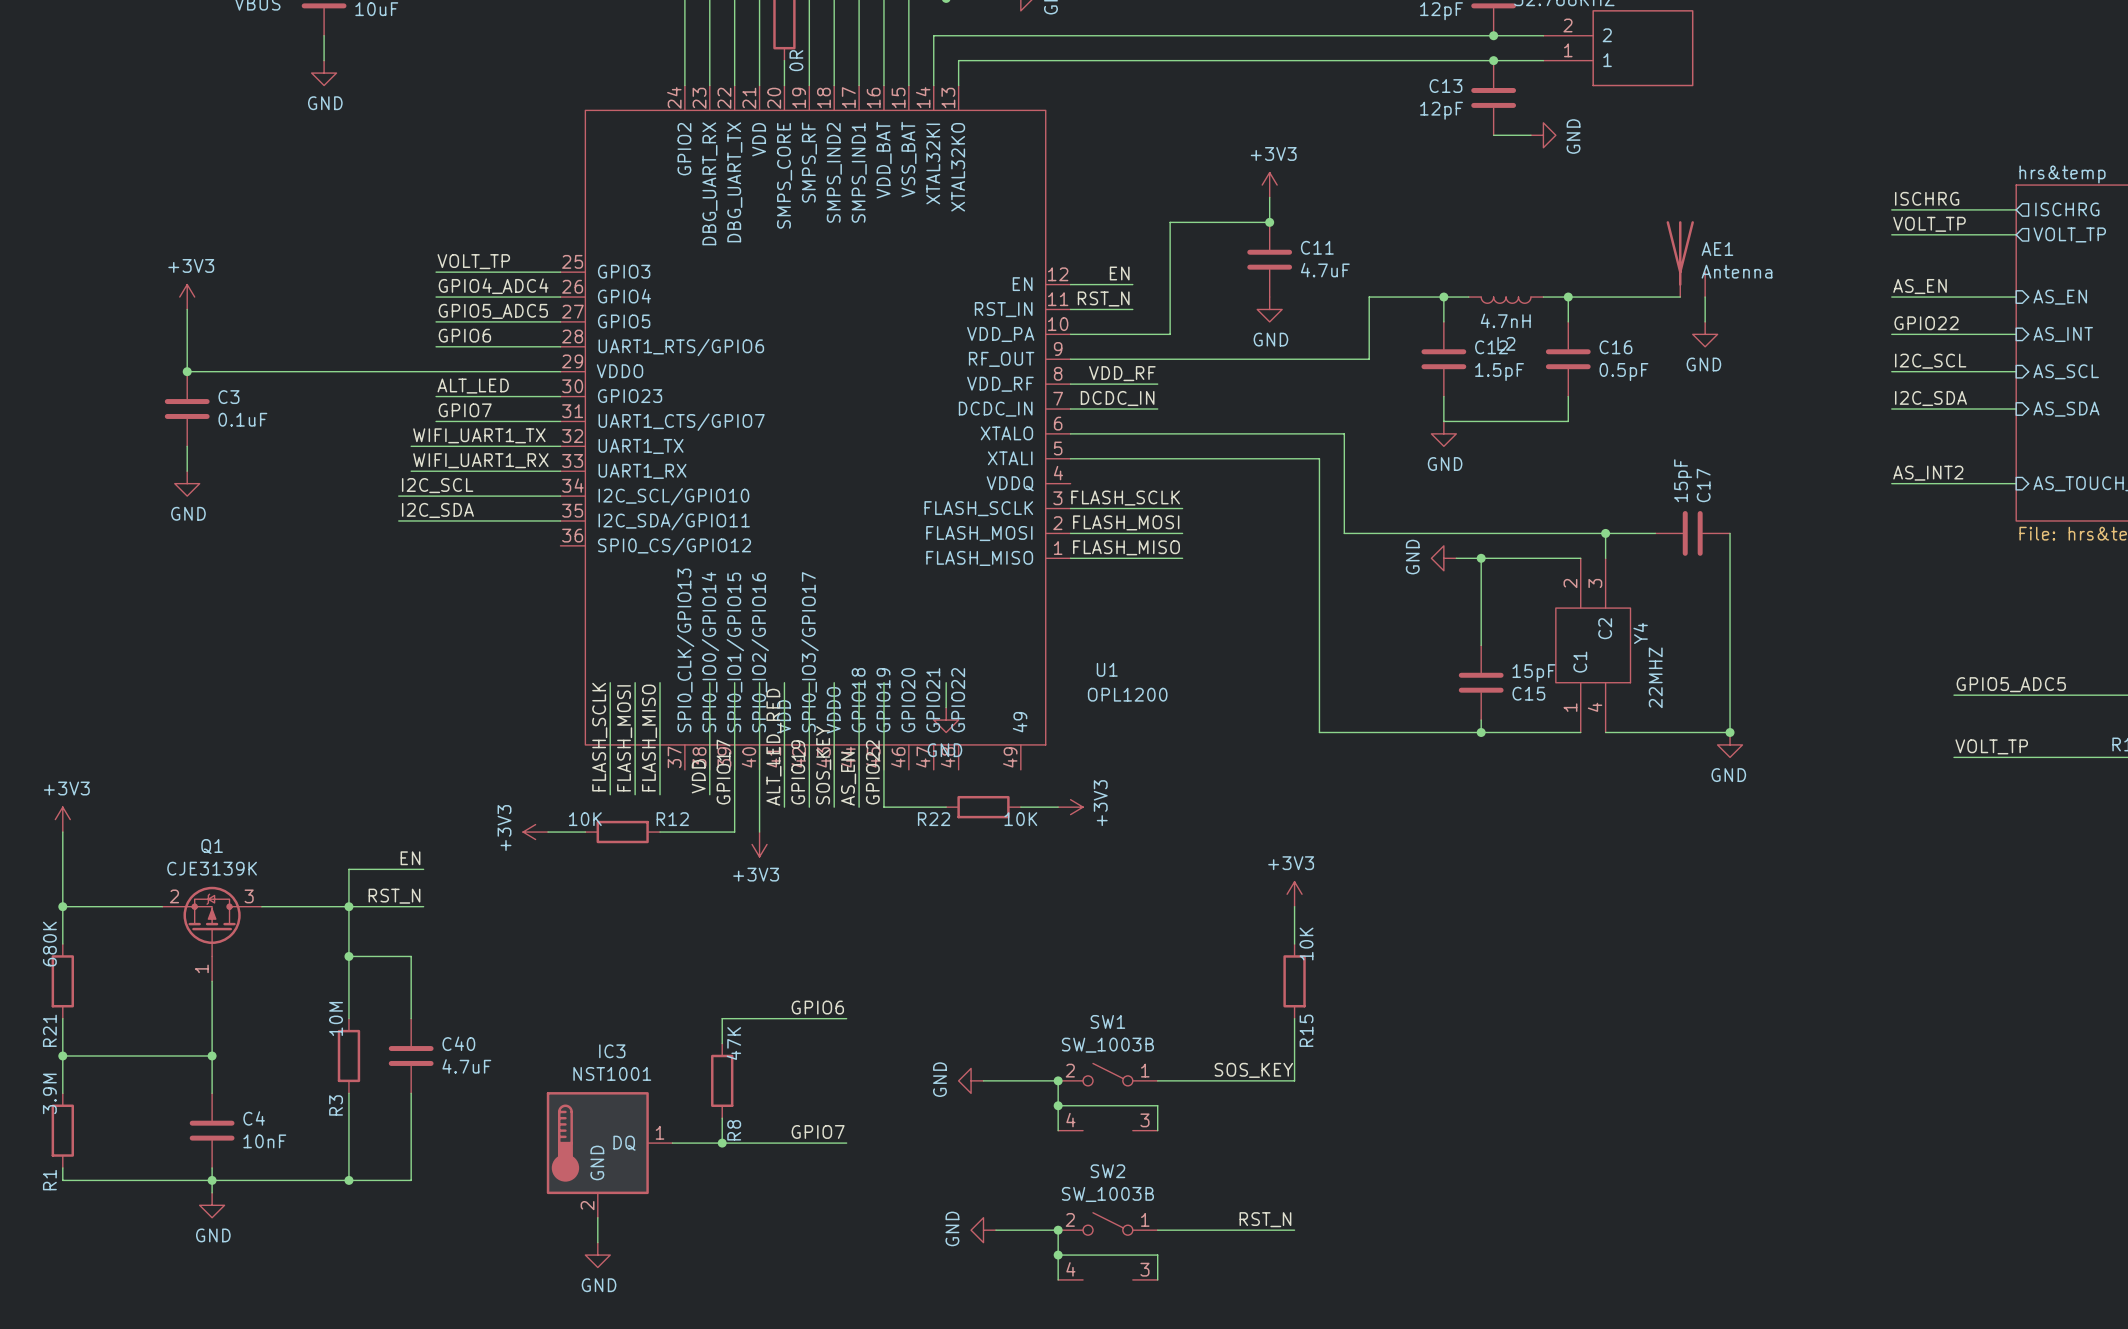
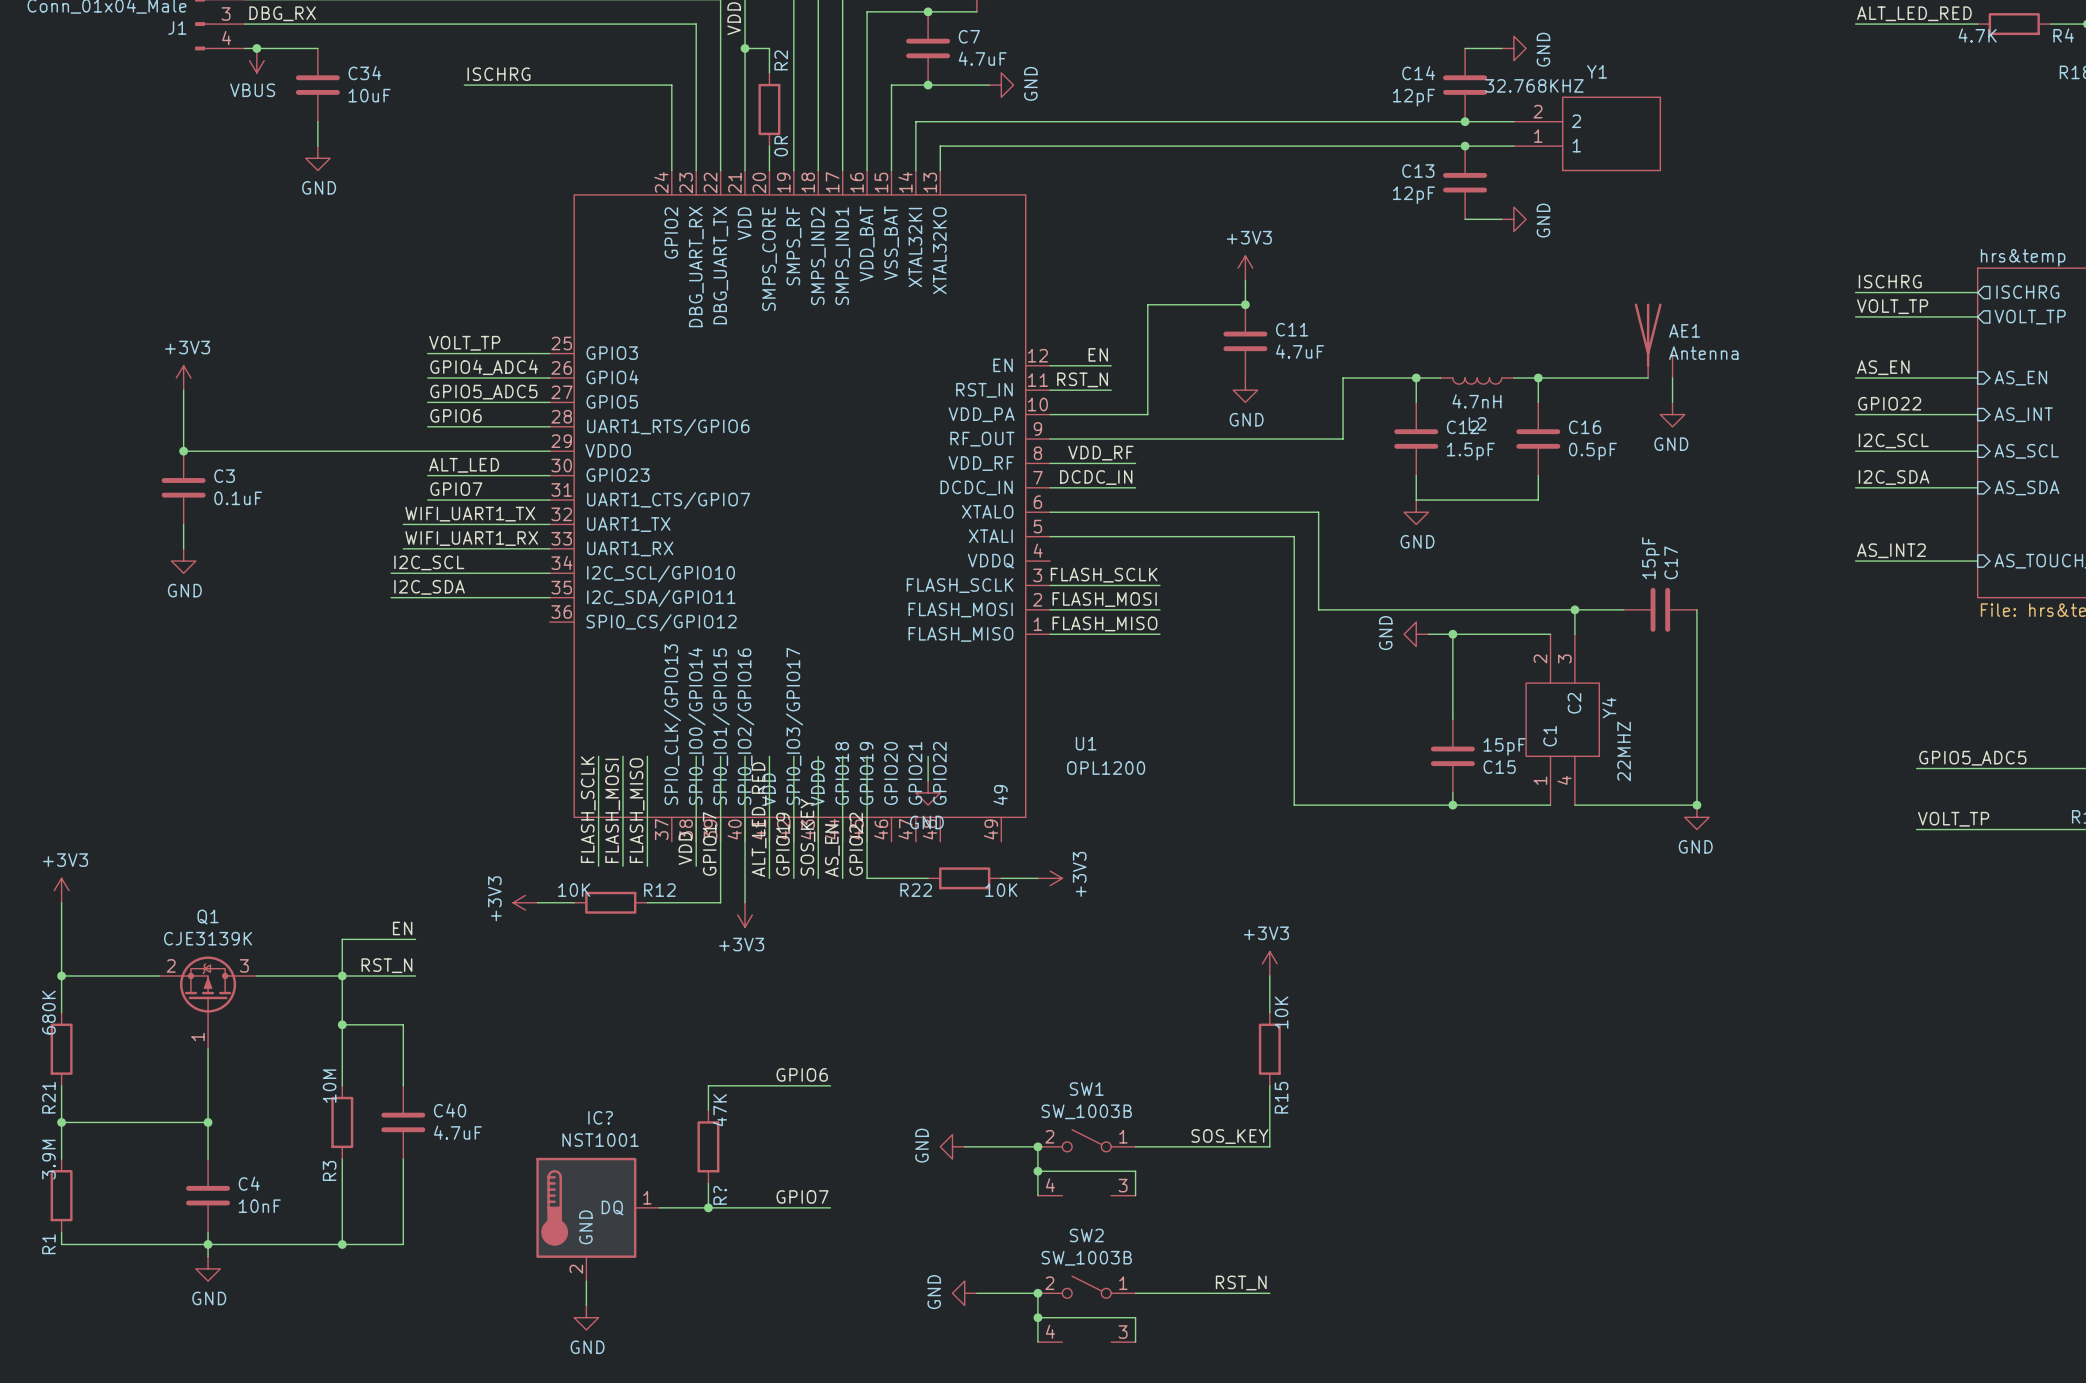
IC3 name: IC3 (612, 1051) -> IC? (600, 1117)
R8 name: R8 (734, 1130) -> R? (720, 1195)

